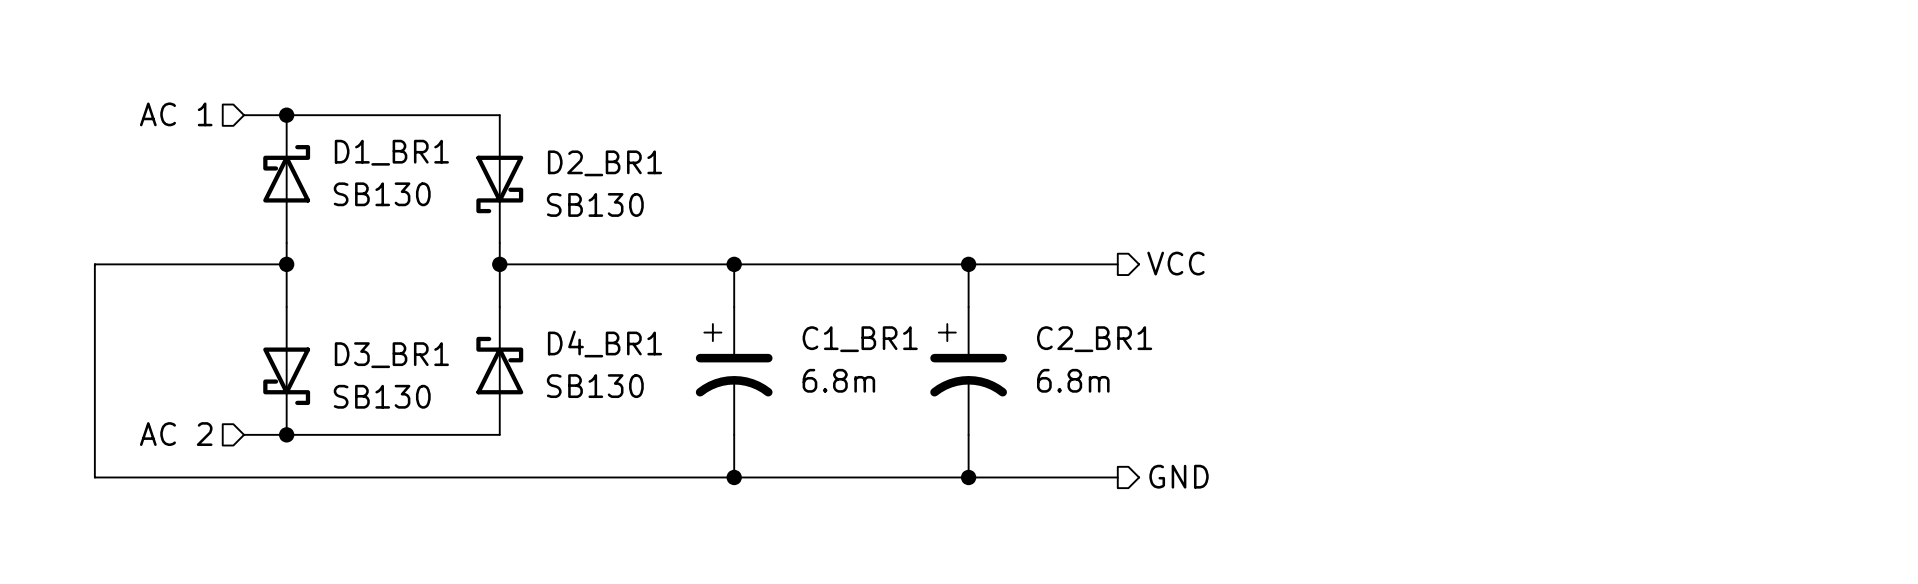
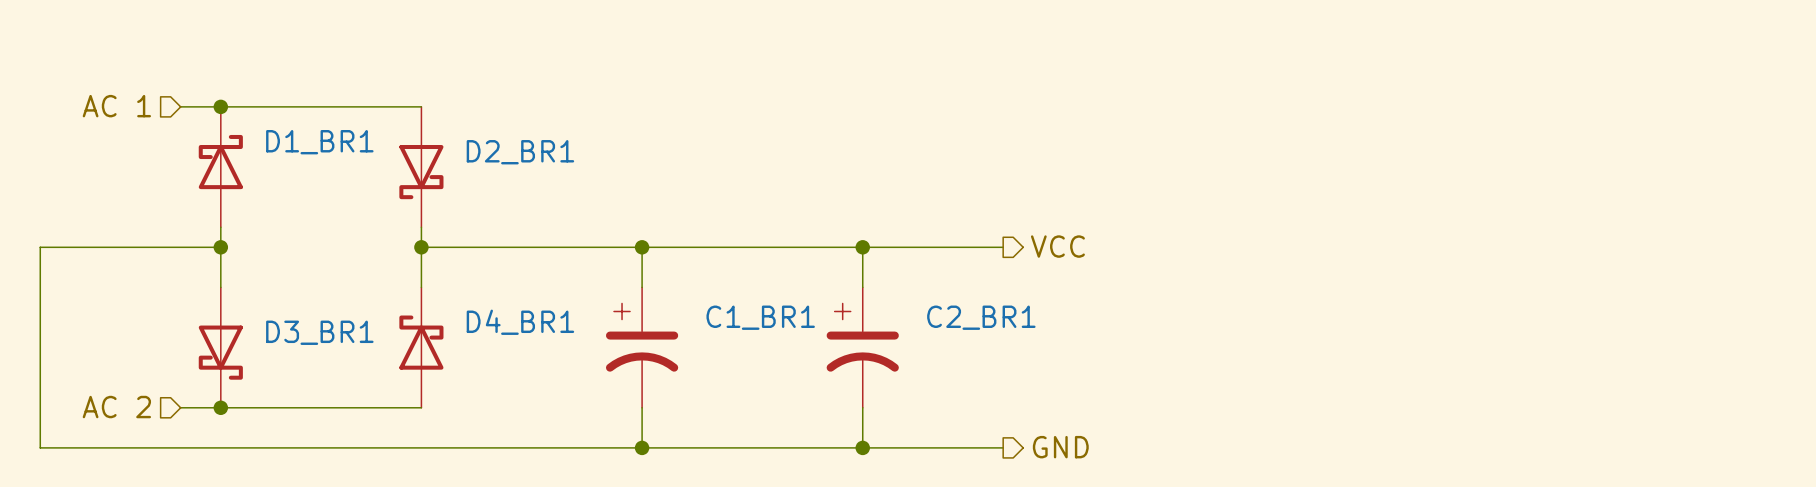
D1_BR1 value: SB130 (382, 194) -> none
D2_BR1 value: SB130 (595, 204) -> none
C1_BR1 value: 6.8m (838, 380) -> none
C2_BR1 value: 6.8m (1073, 380) -> none
D4_BR1 value: SB130 (595, 386) -> none
D3_BR1 value: SB130 (382, 396) -> none

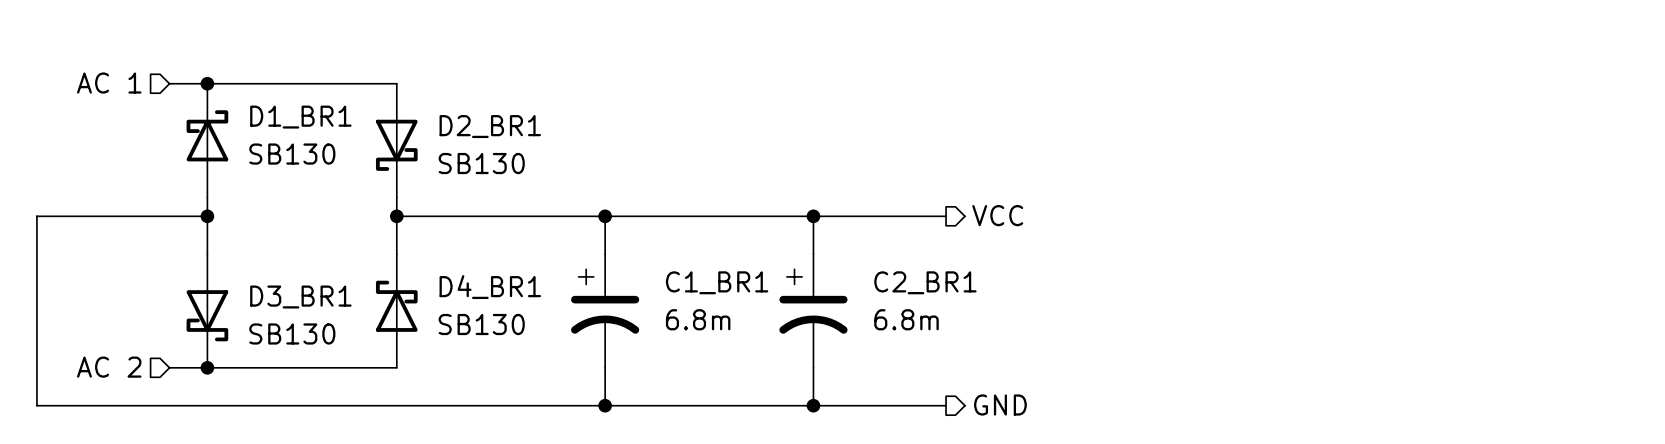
D1_BR1 value: none -> SB130 (292, 154)
D2_BR1 value: none -> SB130 (481, 163)
C1_BR1 value: none -> 6.8m (698, 319)
C2_BR1 value: none -> 6.8m (906, 319)
D4_BR1 value: none -> SB130 (481, 324)
D3_BR1 value: none -> SB130 (292, 333)

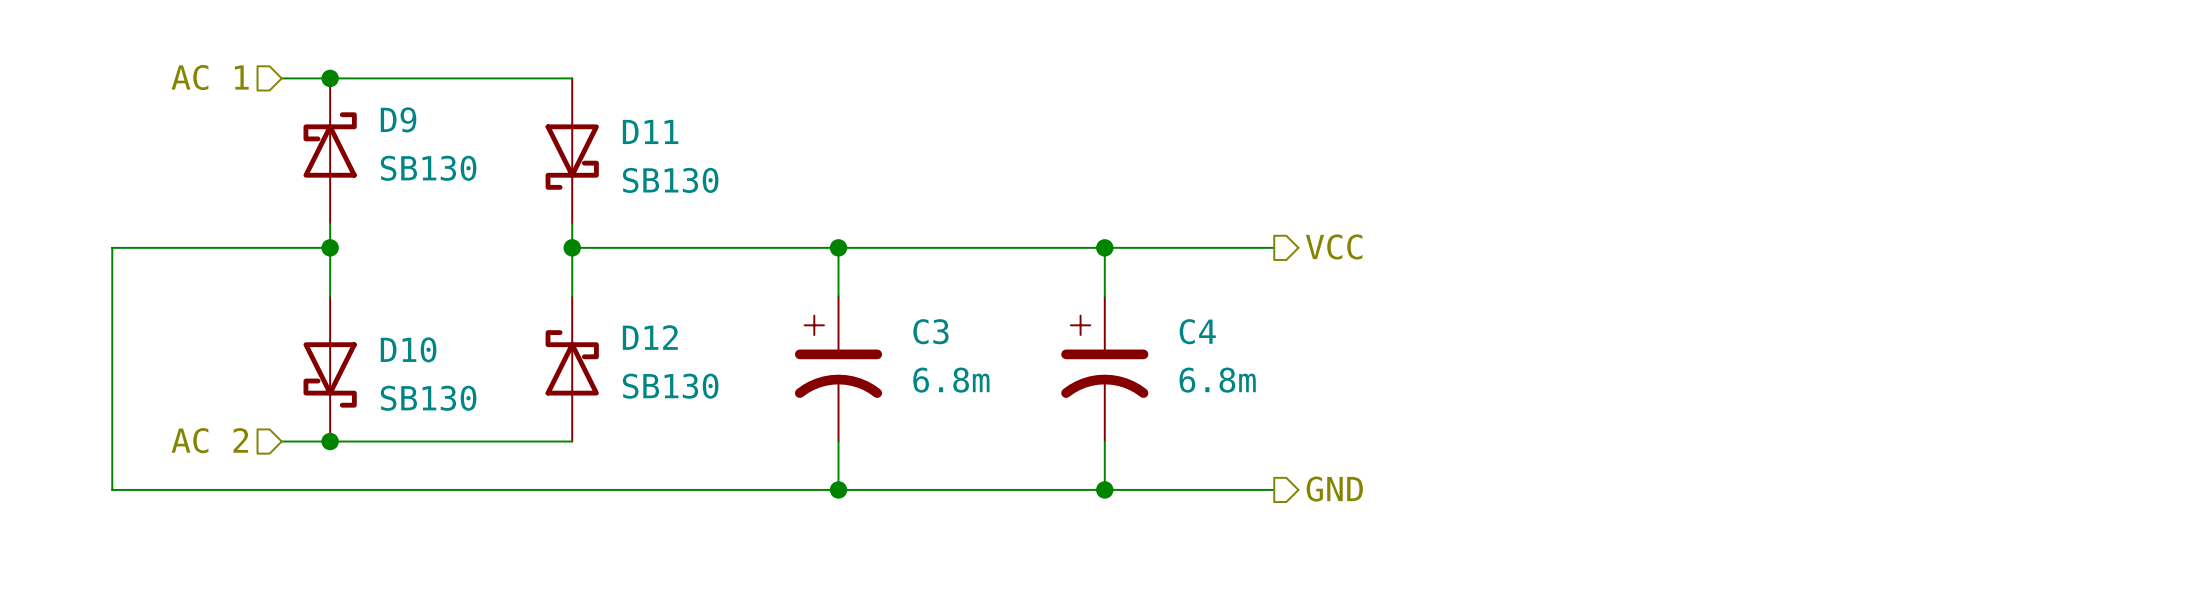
D1_BR1 name: D1_BR1 (300, 117) -> D9 (398, 119)
D2_BR1 name: D2_BR1 (490, 126) -> D11 (650, 131)
C1_BR1 name: C1_BR1 (717, 282) -> C3 (930, 331)
C2_BR1 name: C2_BR1 (925, 282) -> C4 (1197, 331)
D4_BR1 name: D4_BR1 (490, 287) -> D12 (650, 337)
D3_BR1 name: D3_BR1 (300, 297) -> D10 (408, 349)

